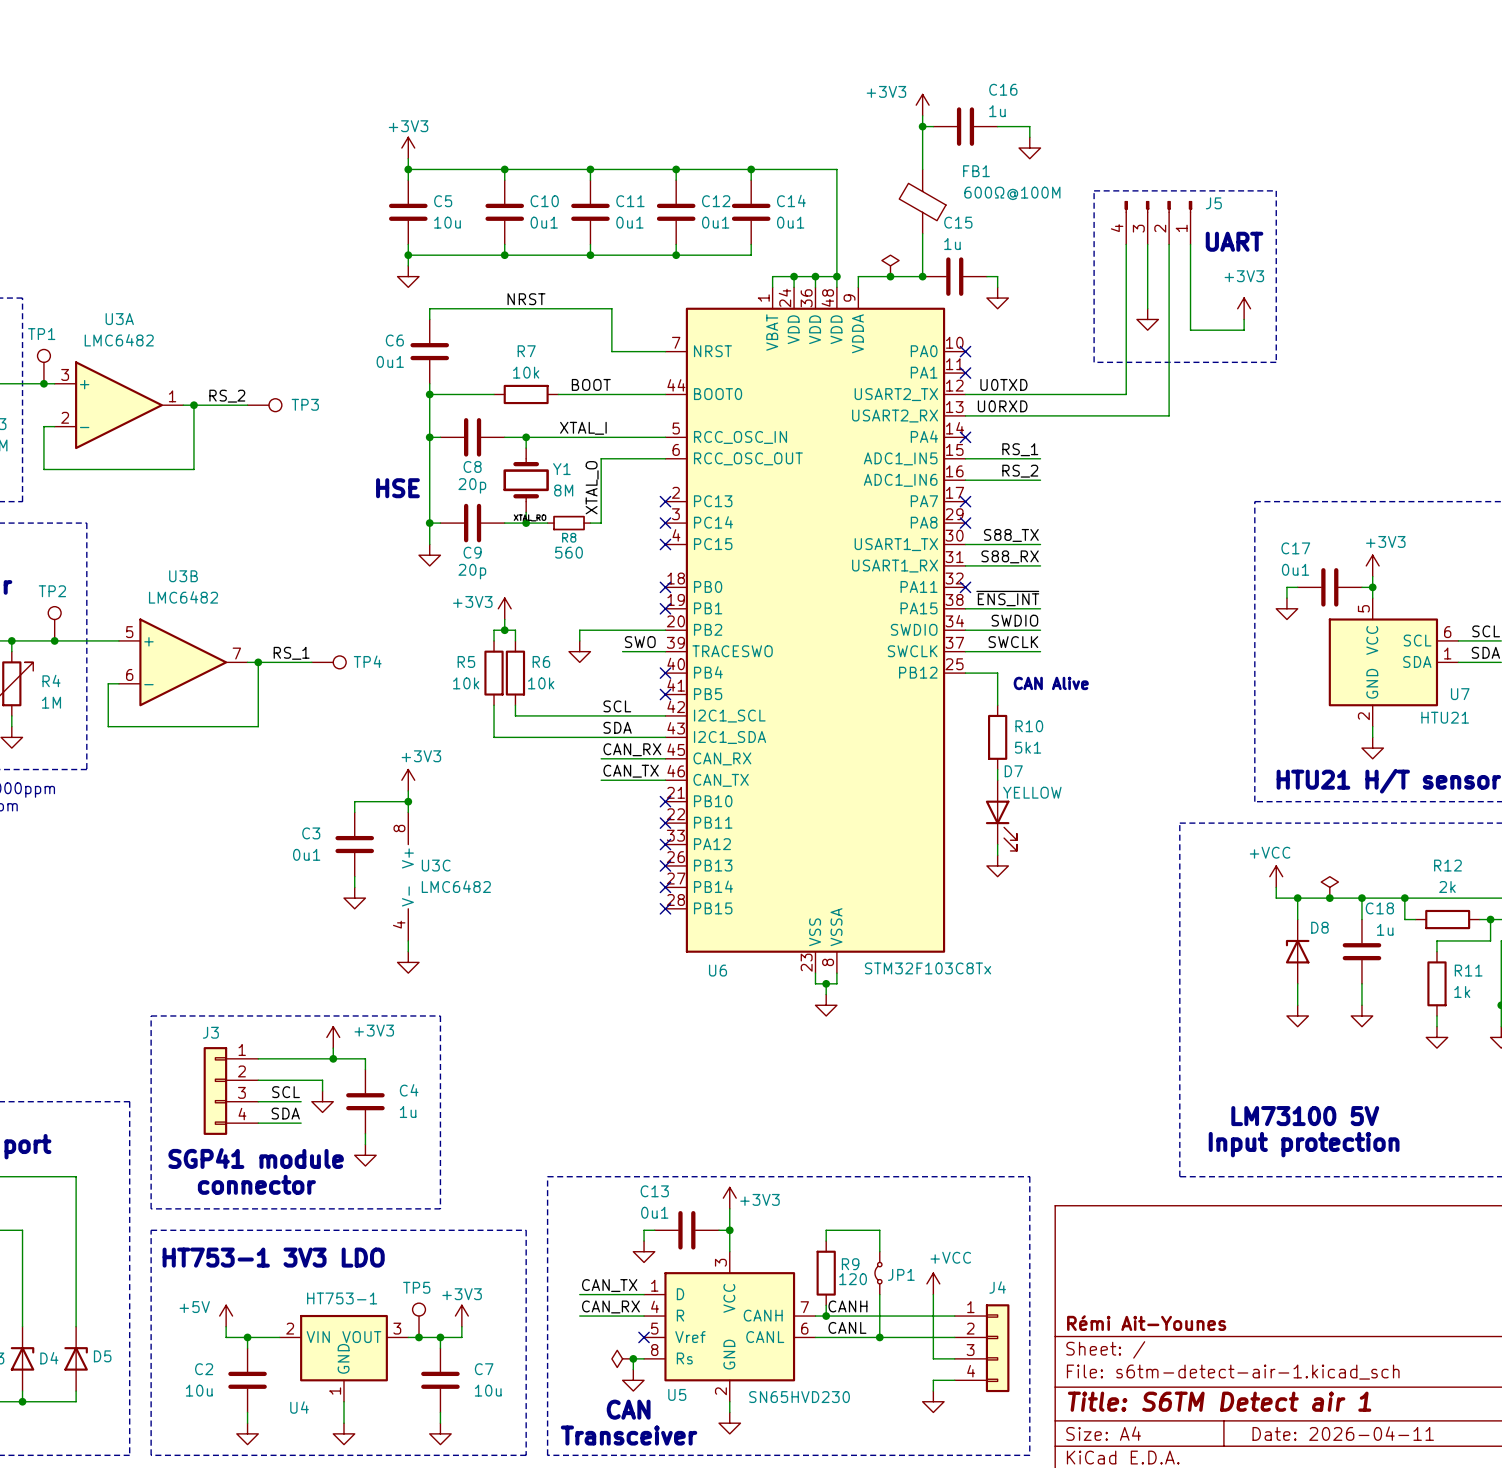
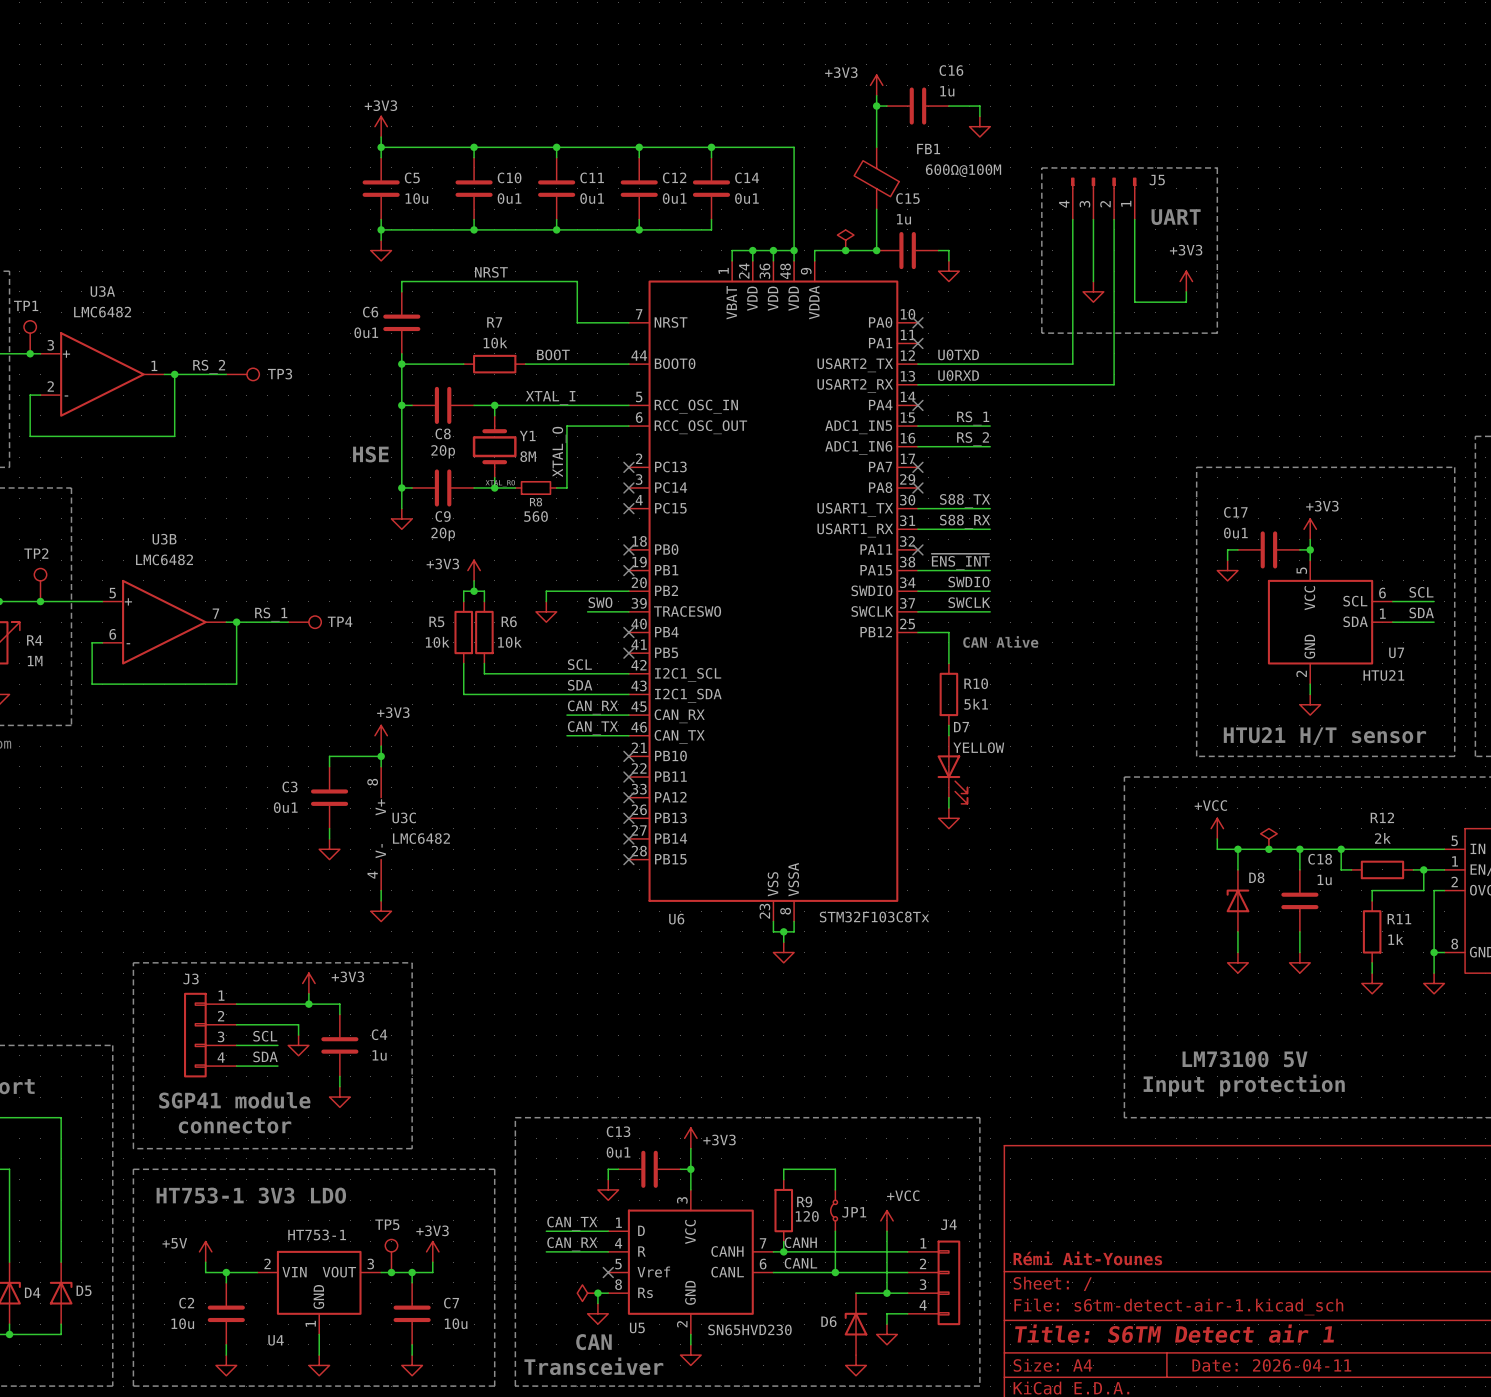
wire: none -> (856, 1293) (886, 1293)
junction: none -> (886, 1293)
D6: none -> (856, 1324)
power symbol: none -> (856, 1365)

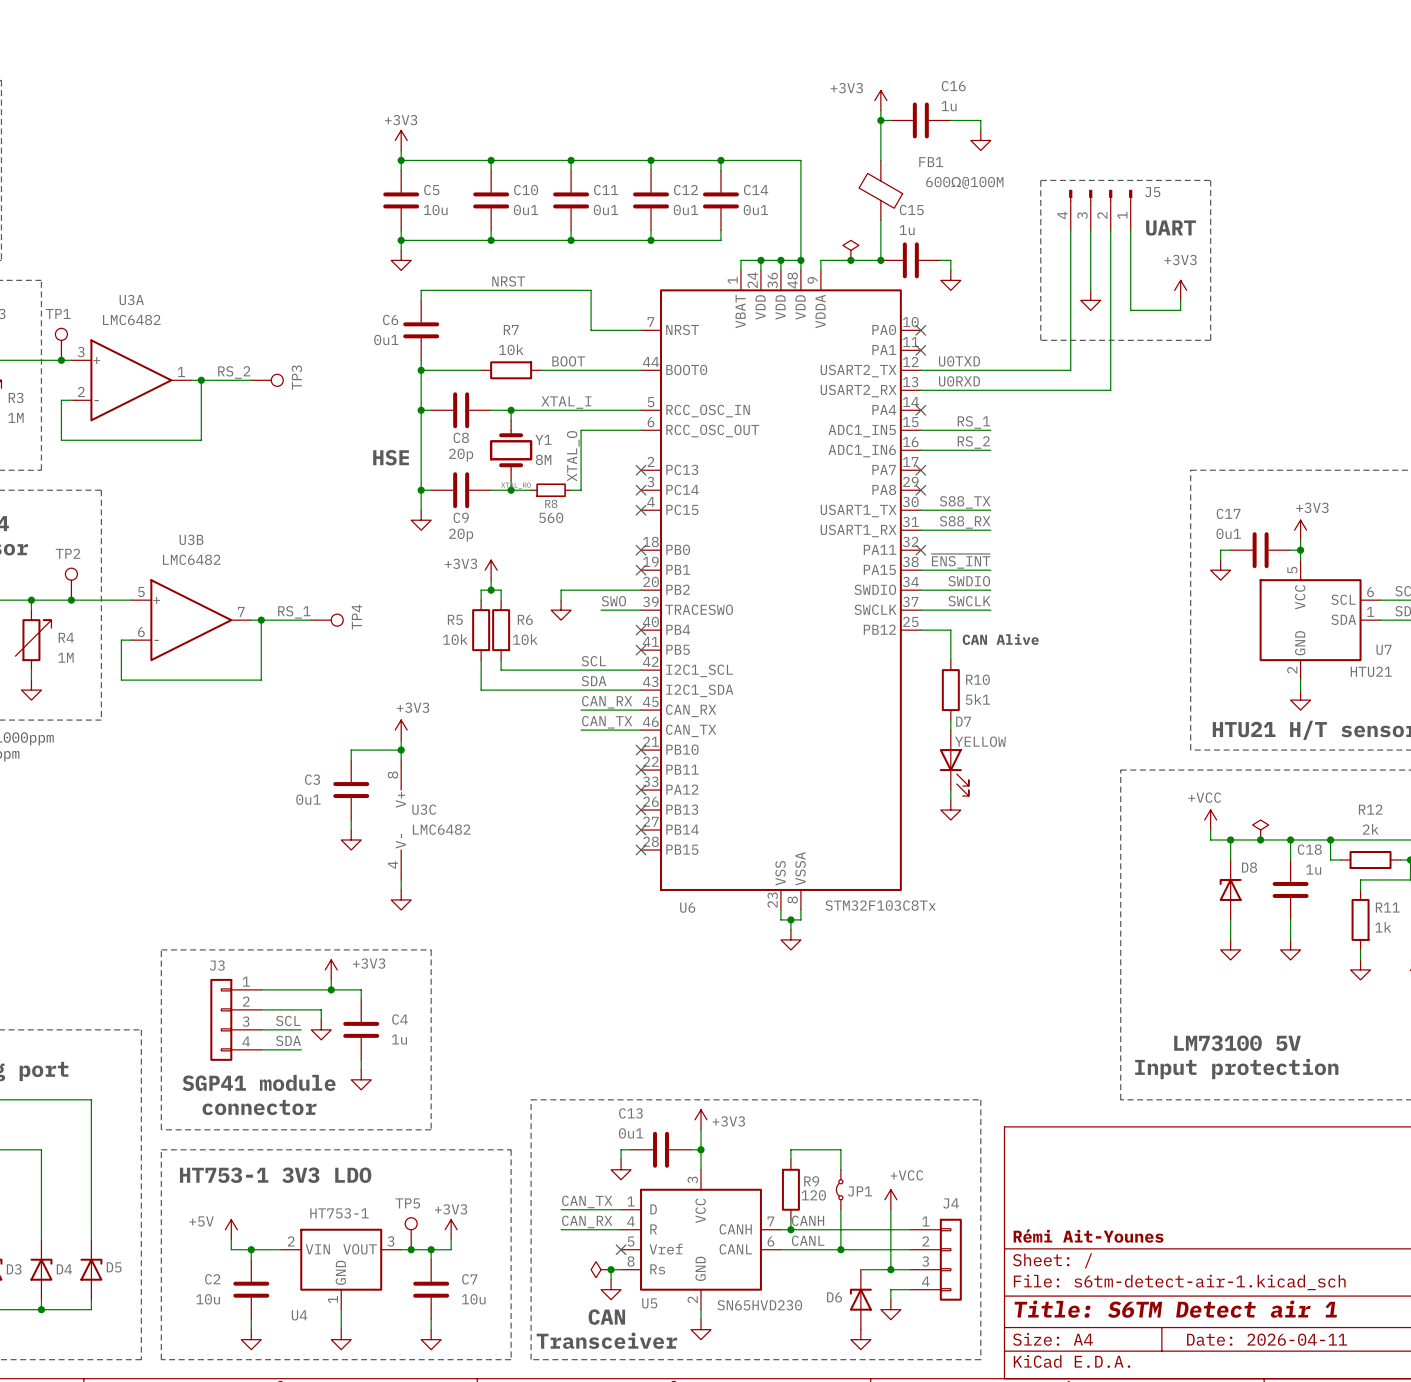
TP3 name rotation: 0° (280, 374) -> 90° counterclockwise (296, 377)
TP4 name rotation: 0° (340, 621) -> 90° counterclockwise (356, 617)

